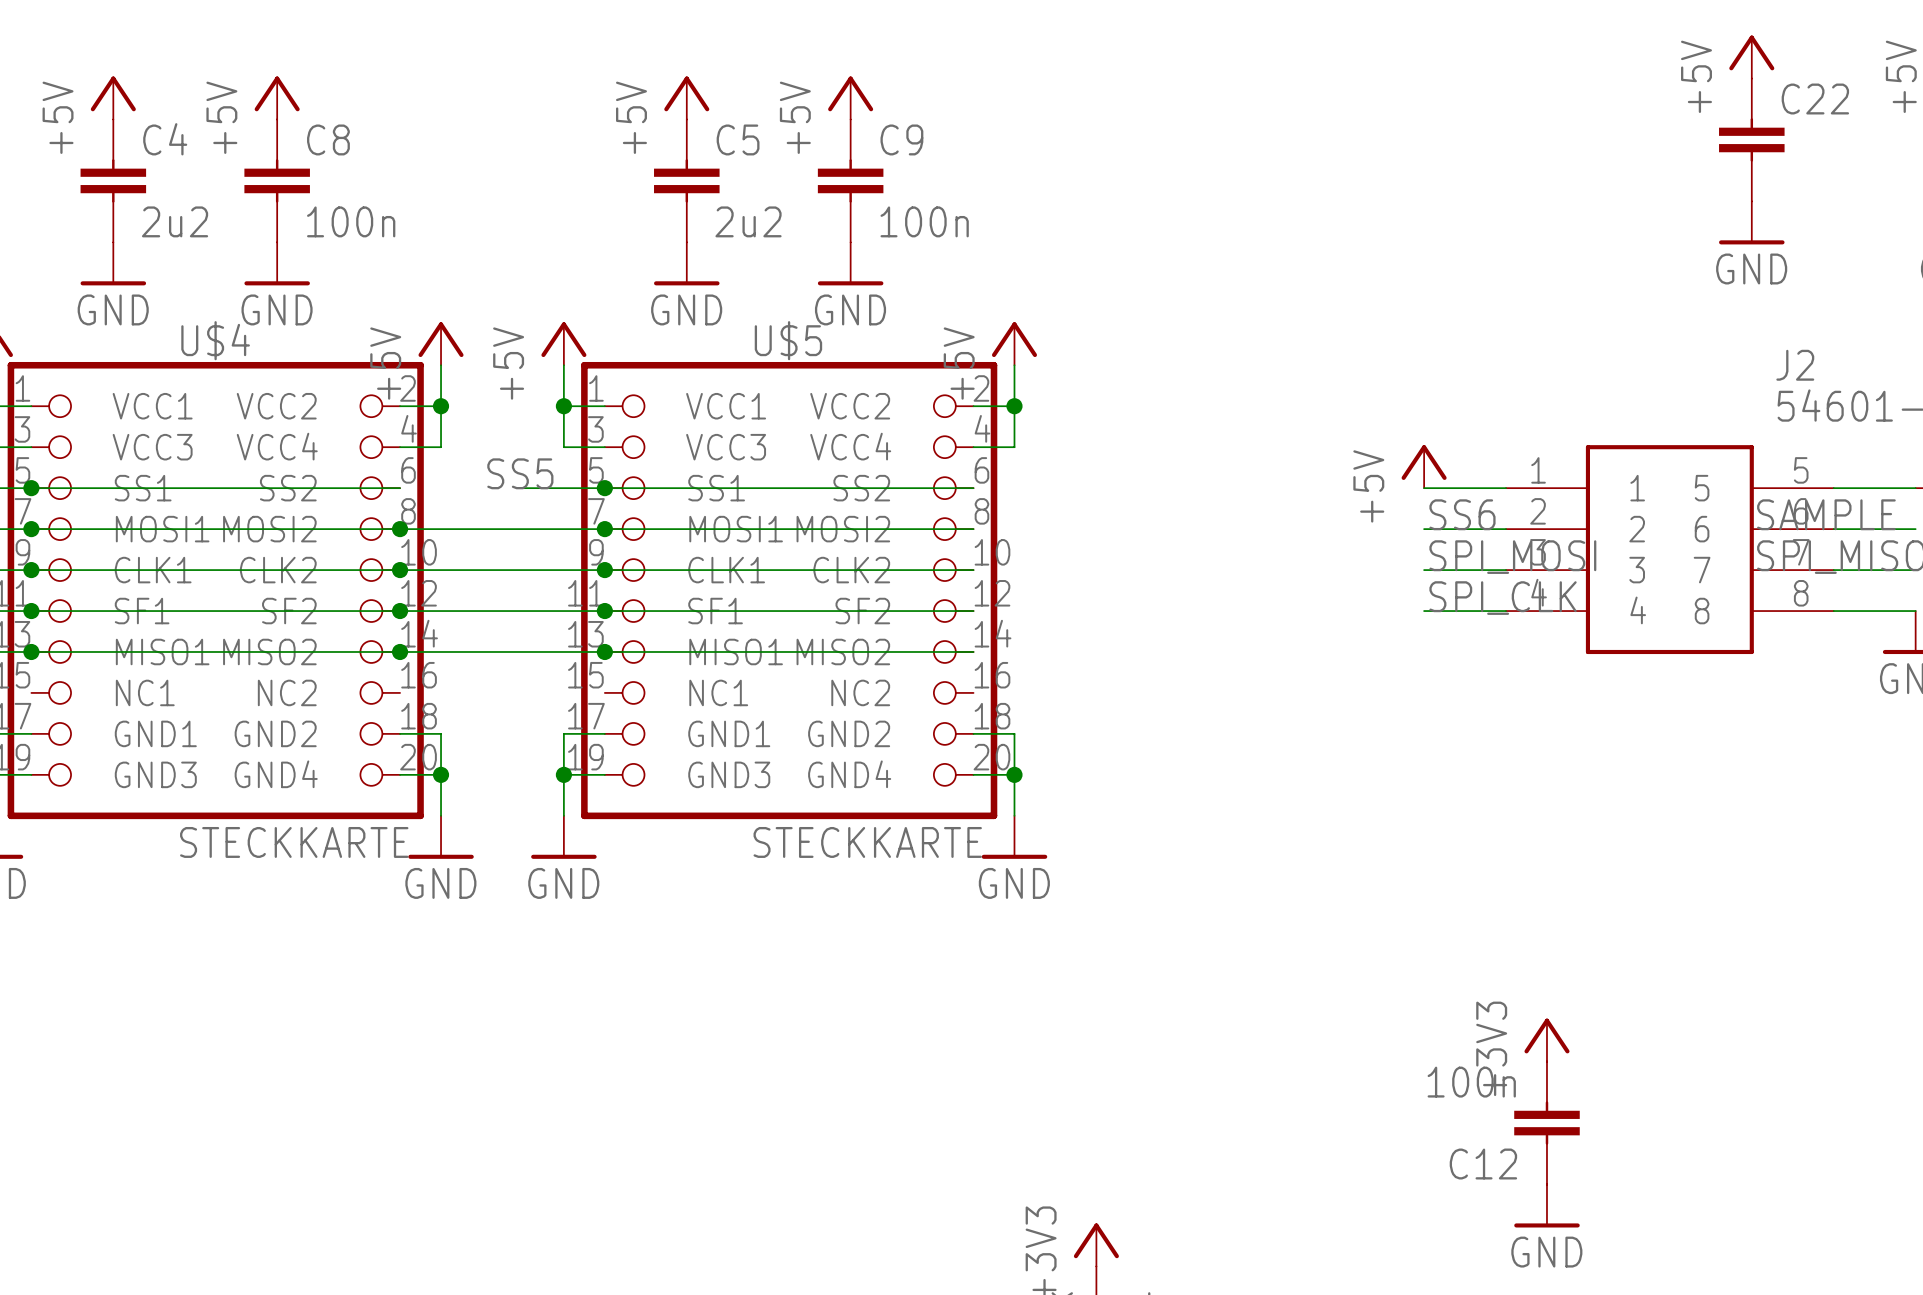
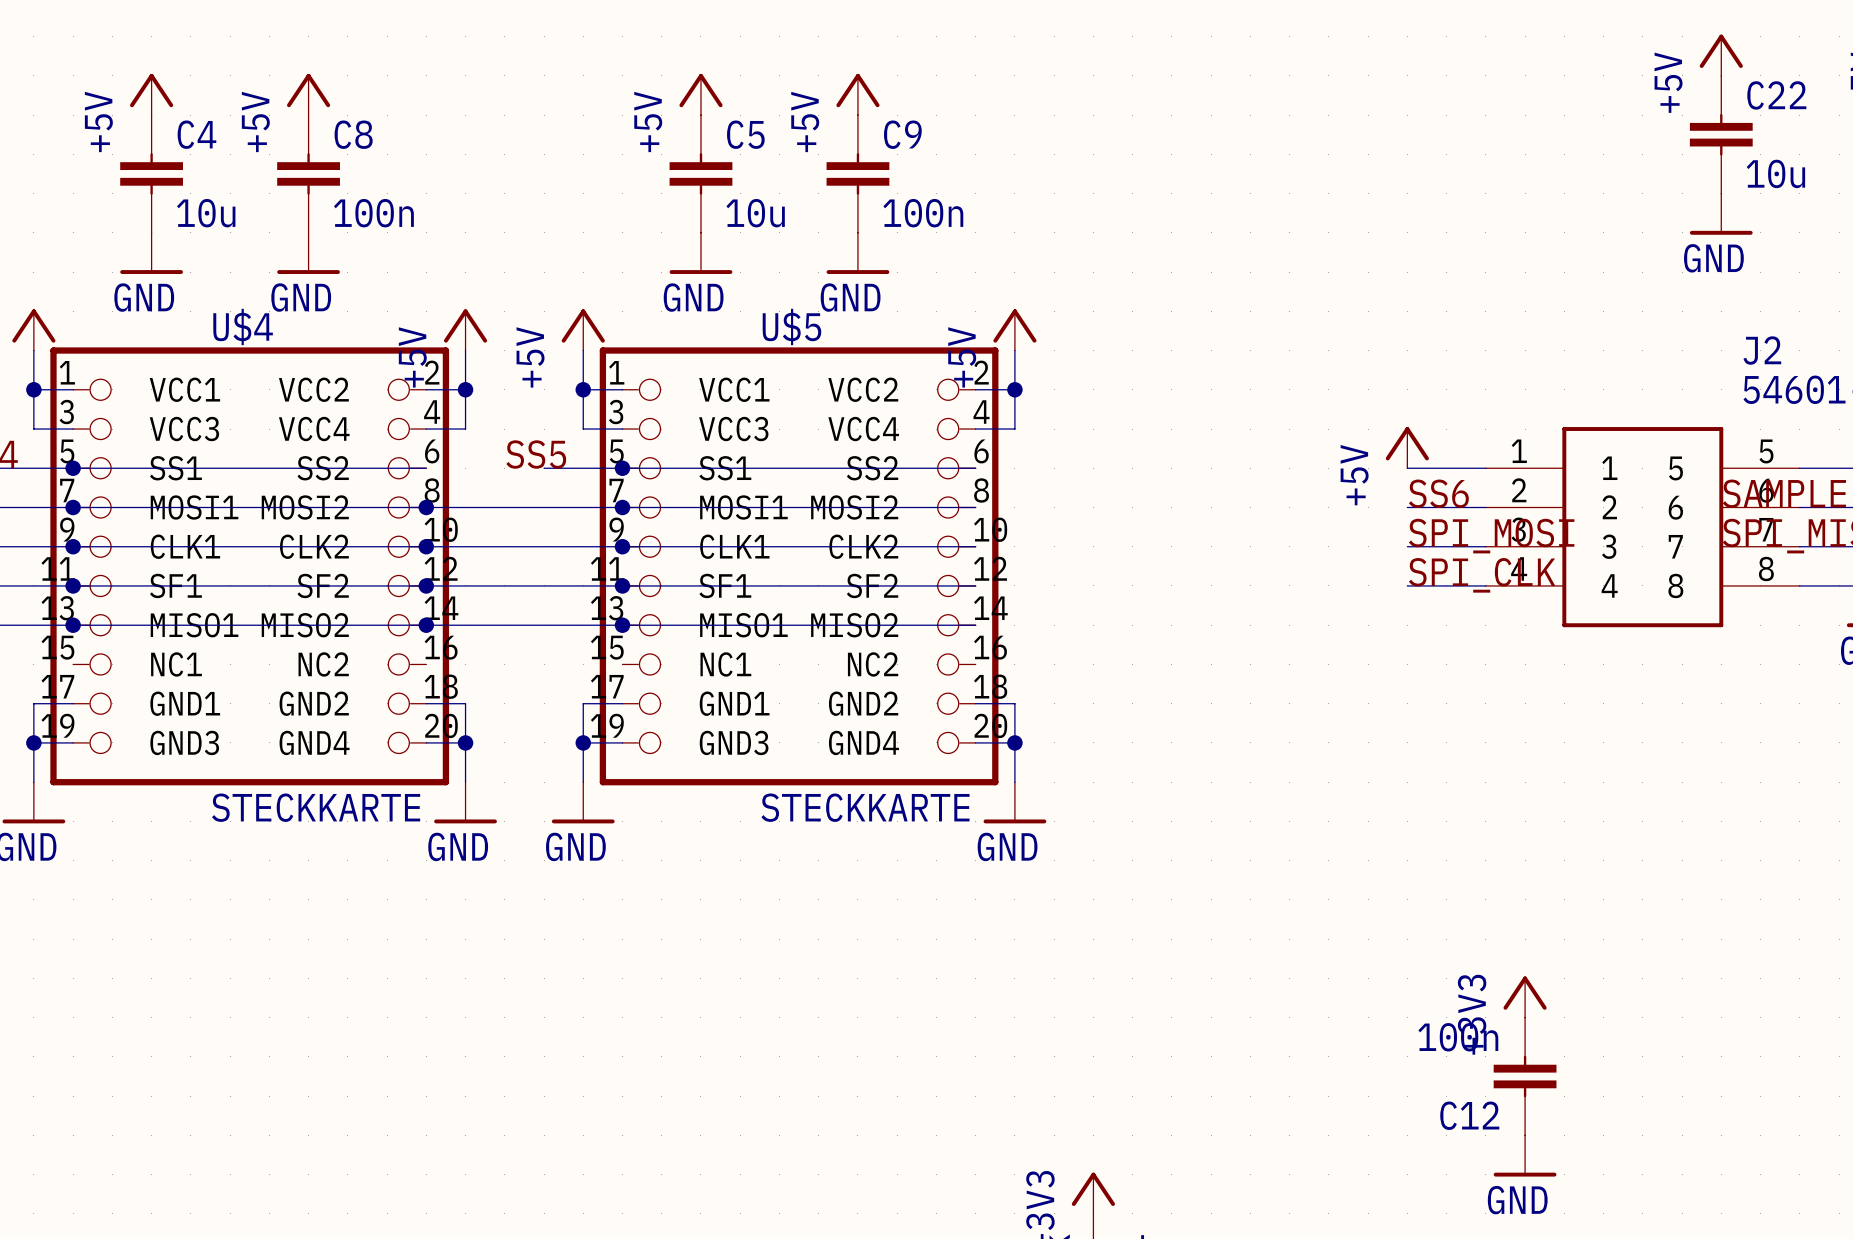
C22 value: none -> 10u (1775, 173)
C4 value: 2u2 (175, 221) -> 10u (206, 213)
C5 value: 2u2 (748, 221) -> 10u (755, 213)

